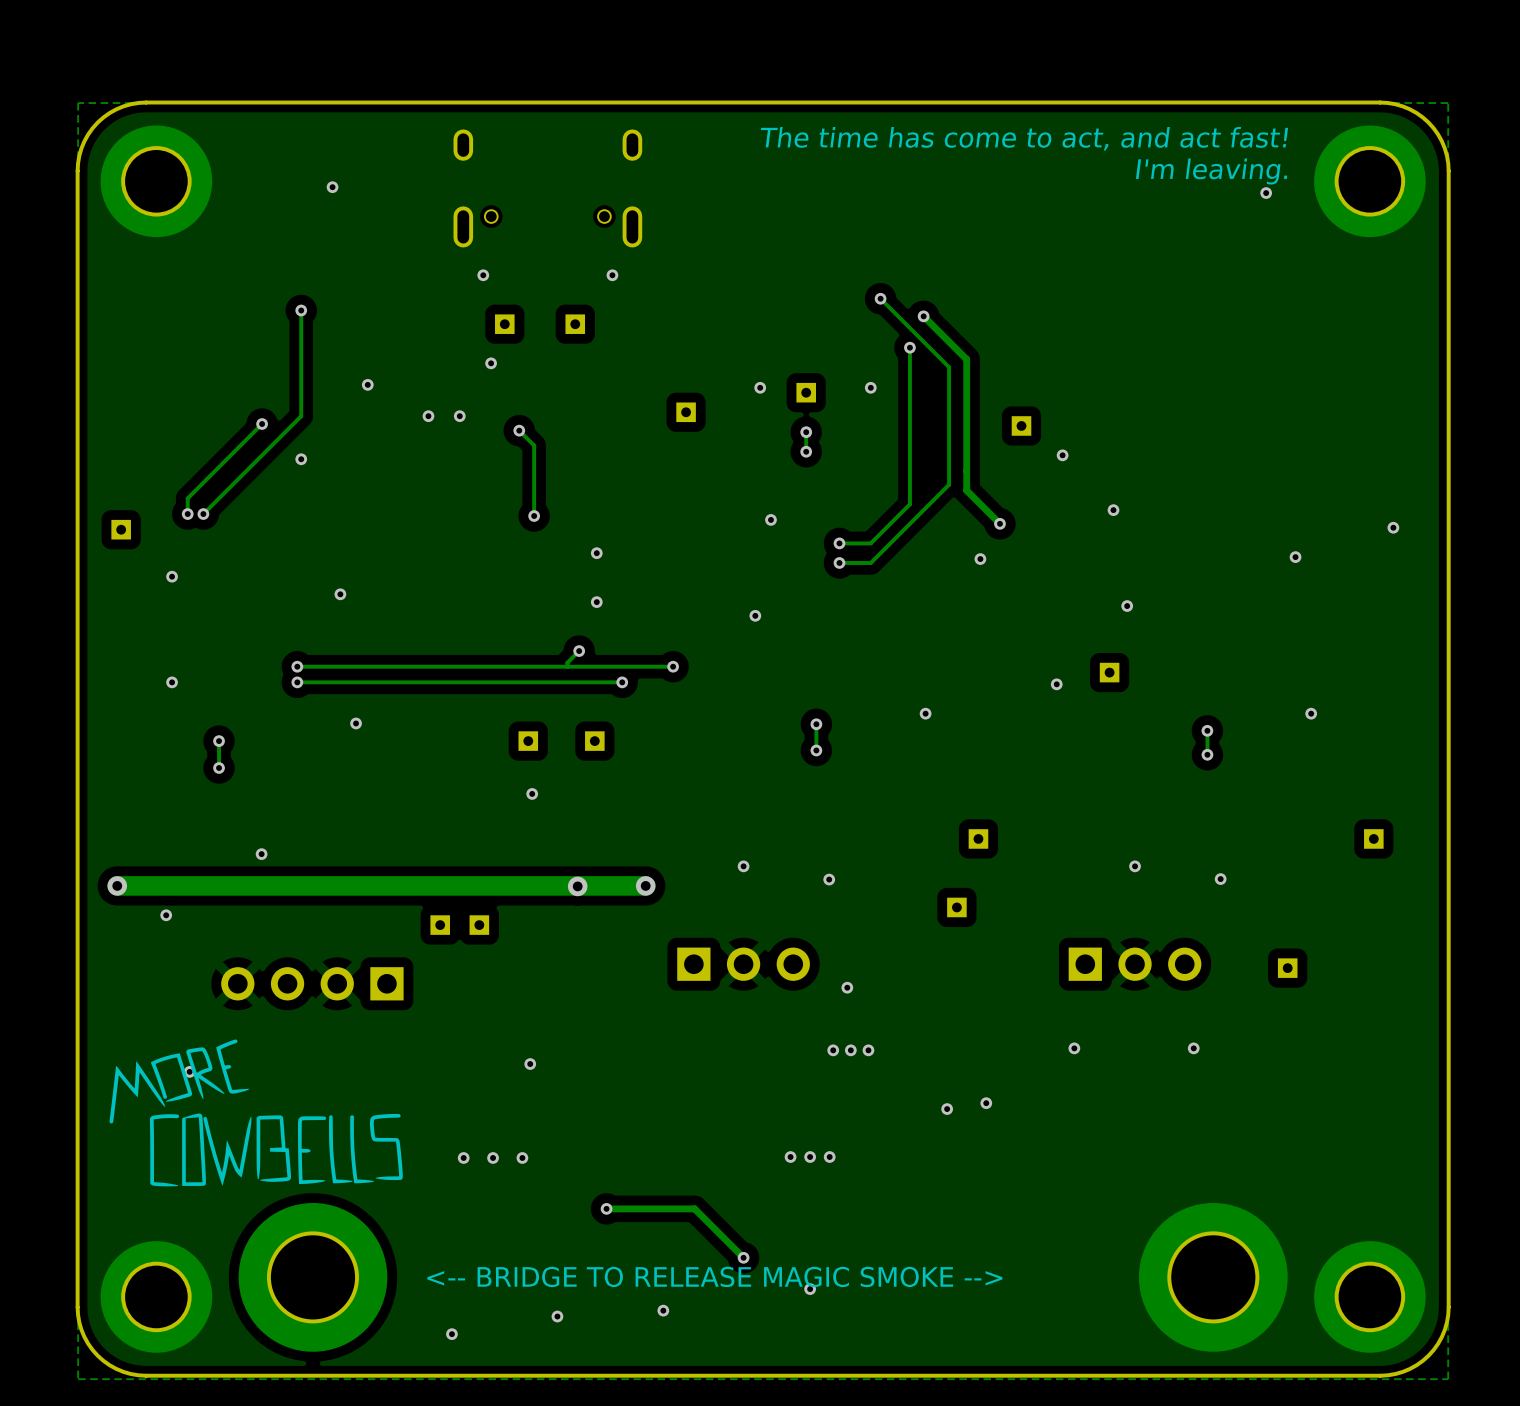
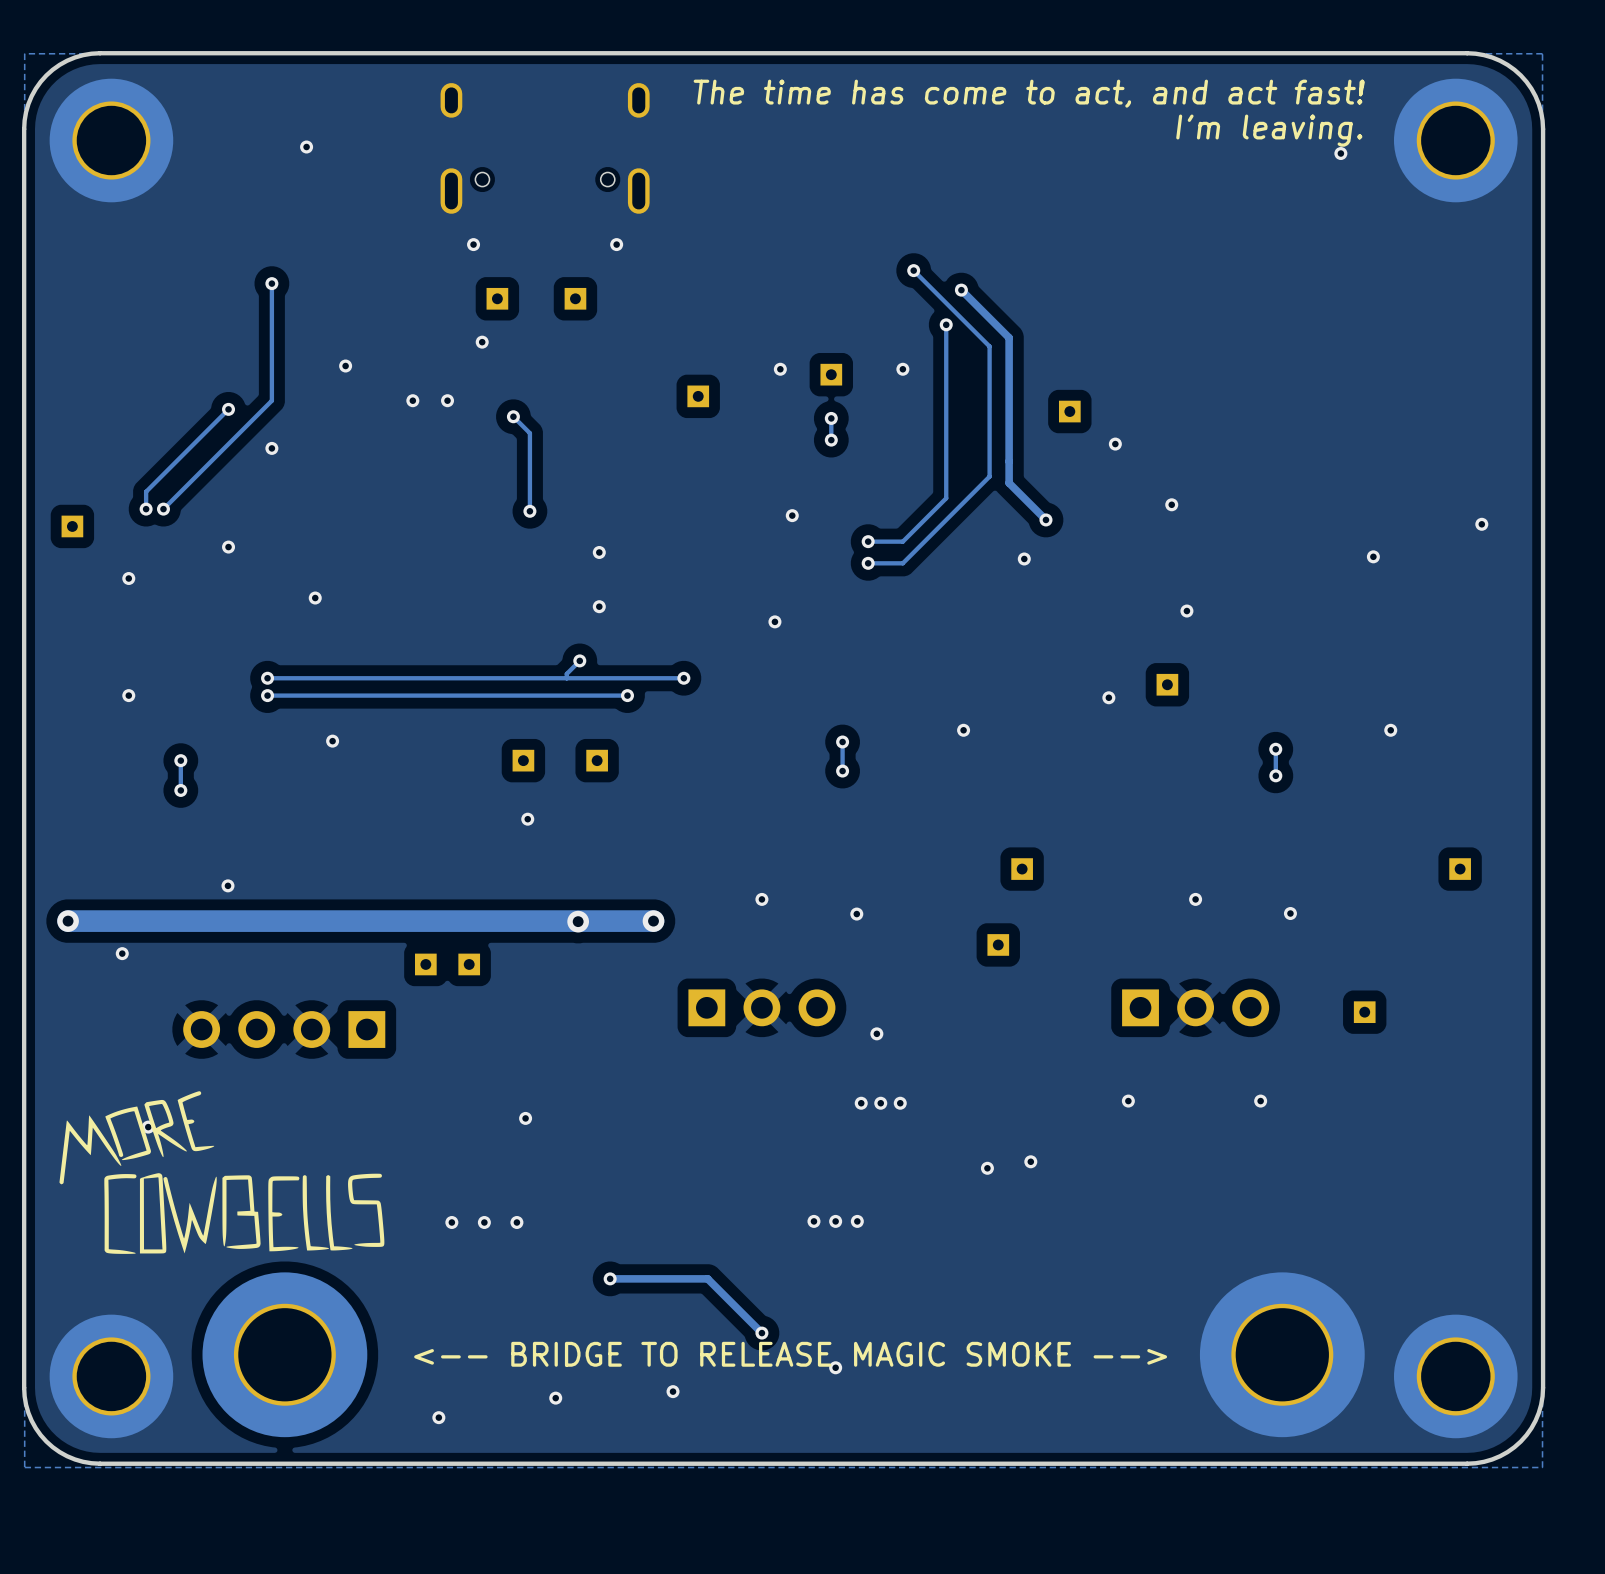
via: none -> (228, 547)

